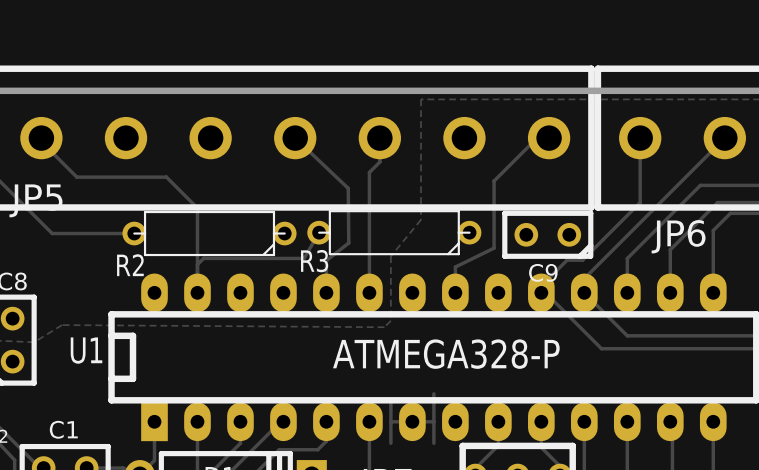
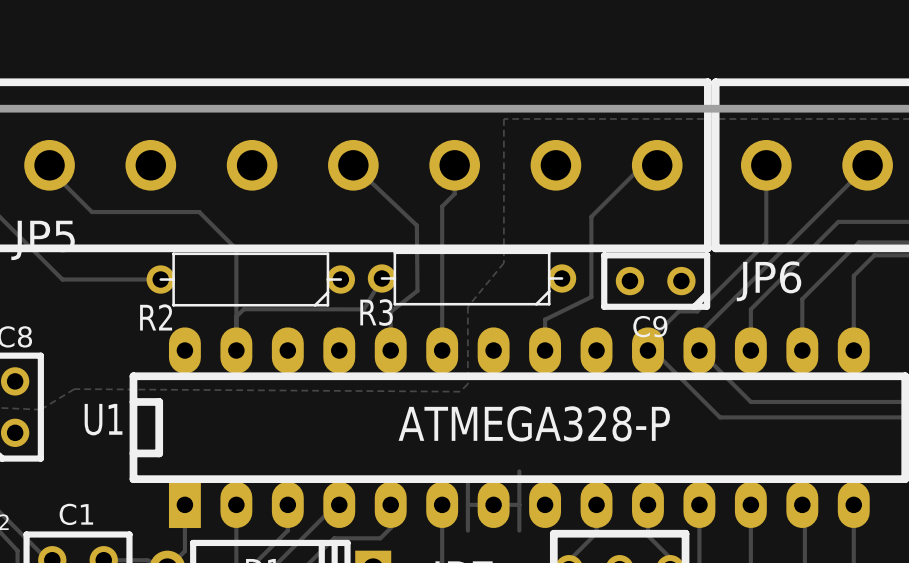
JP6 name position: JP6 (678, 236) -> JP6 (769, 281)

